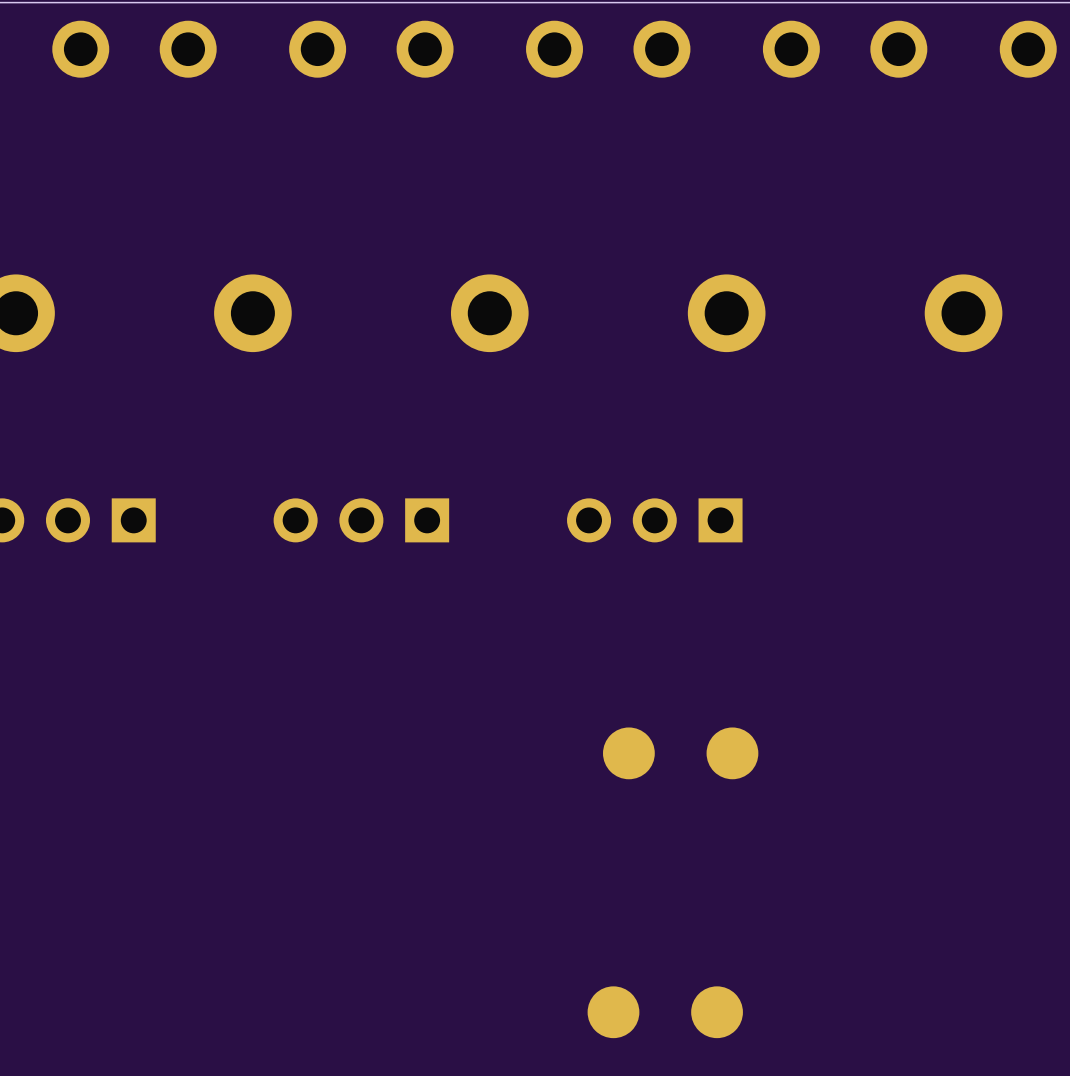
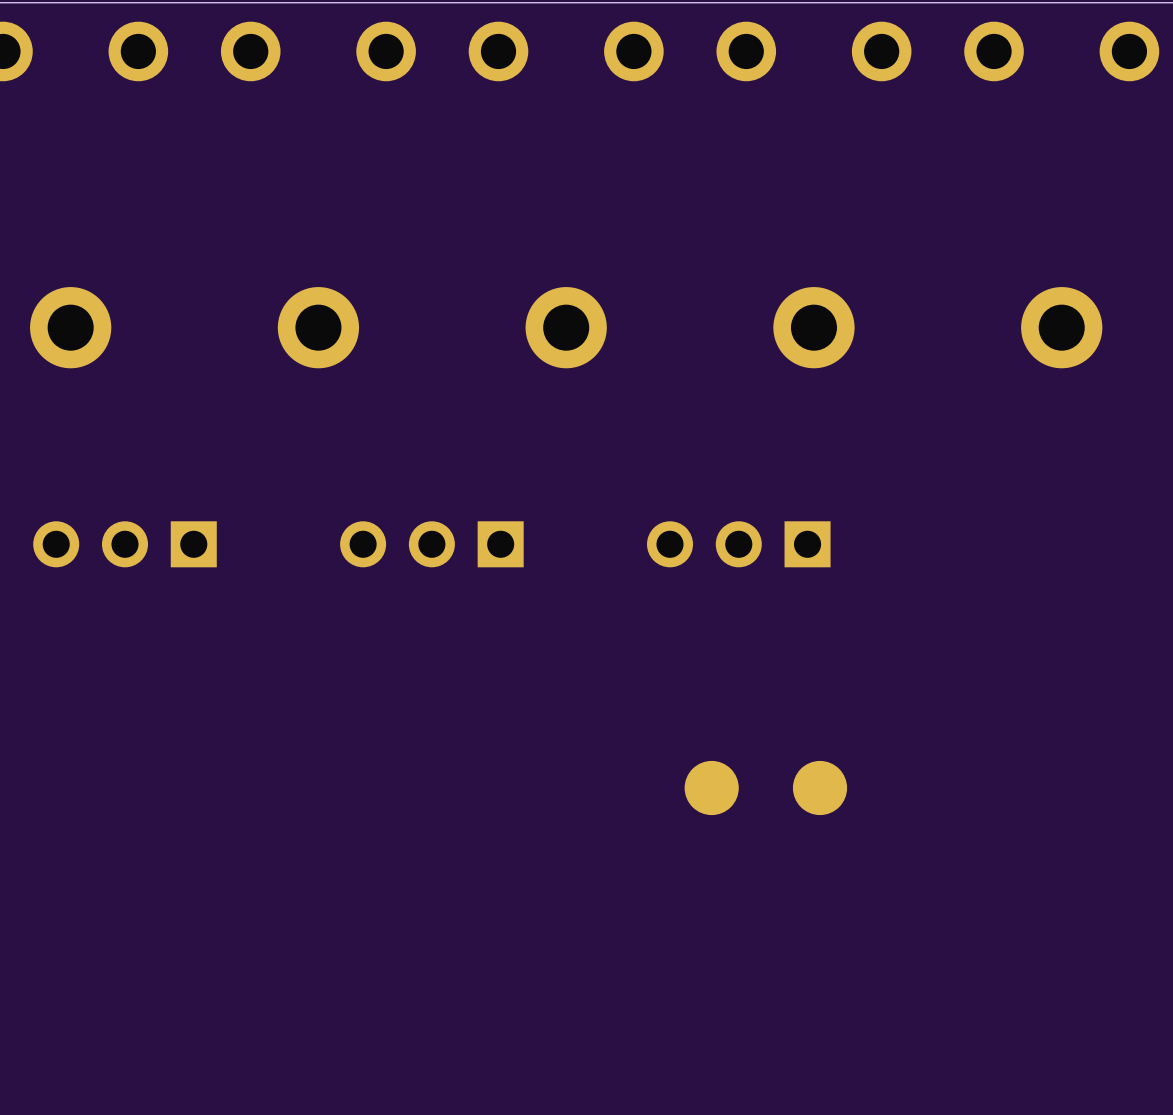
part: (665, 1012) -> none

